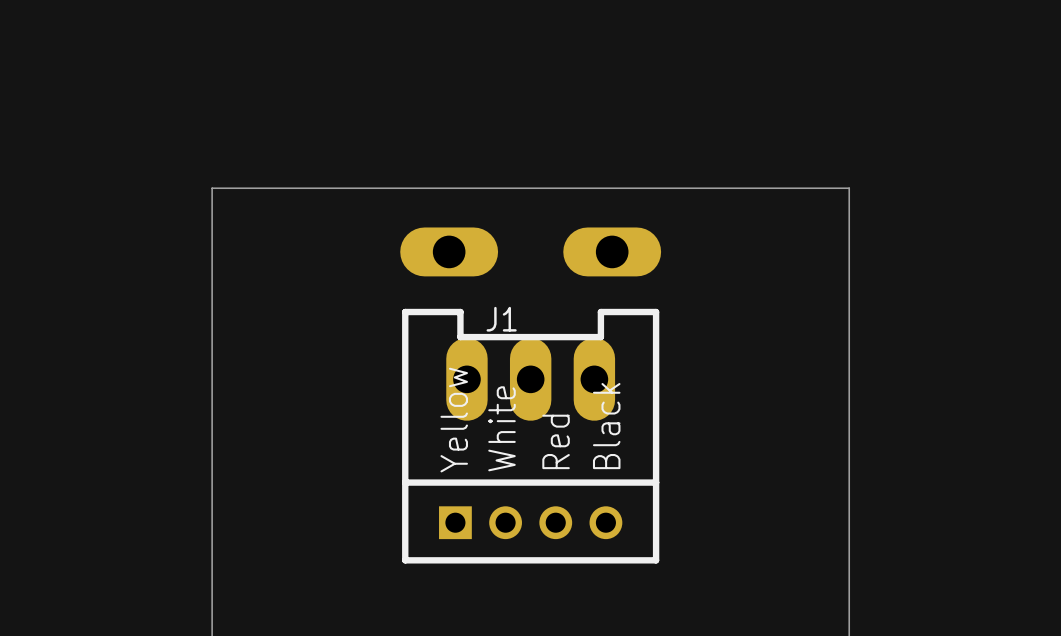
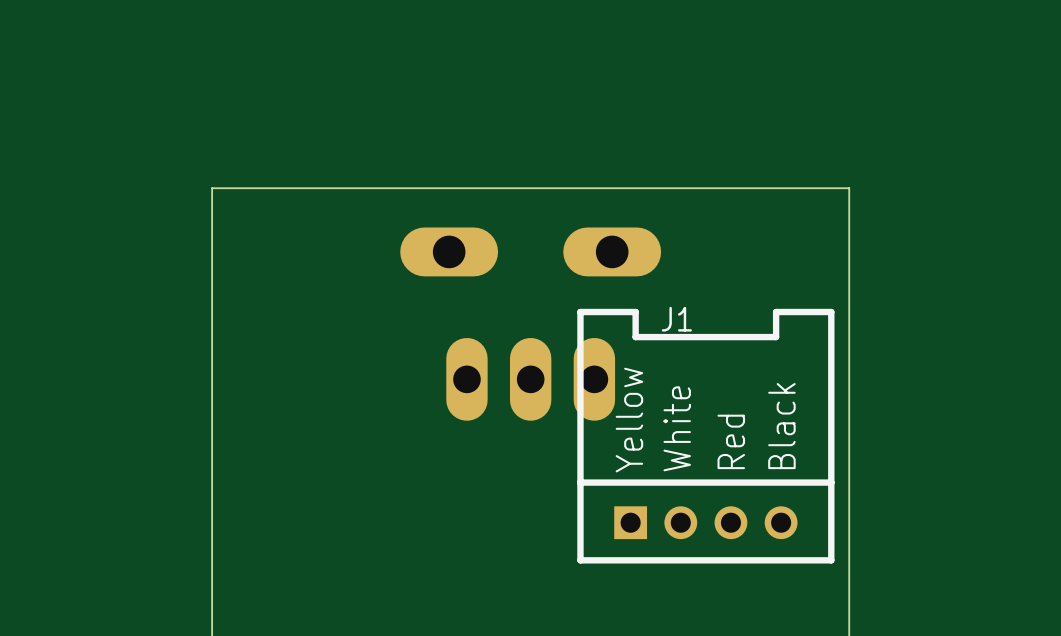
J1 position: (530, 436) -> (705, 436)

